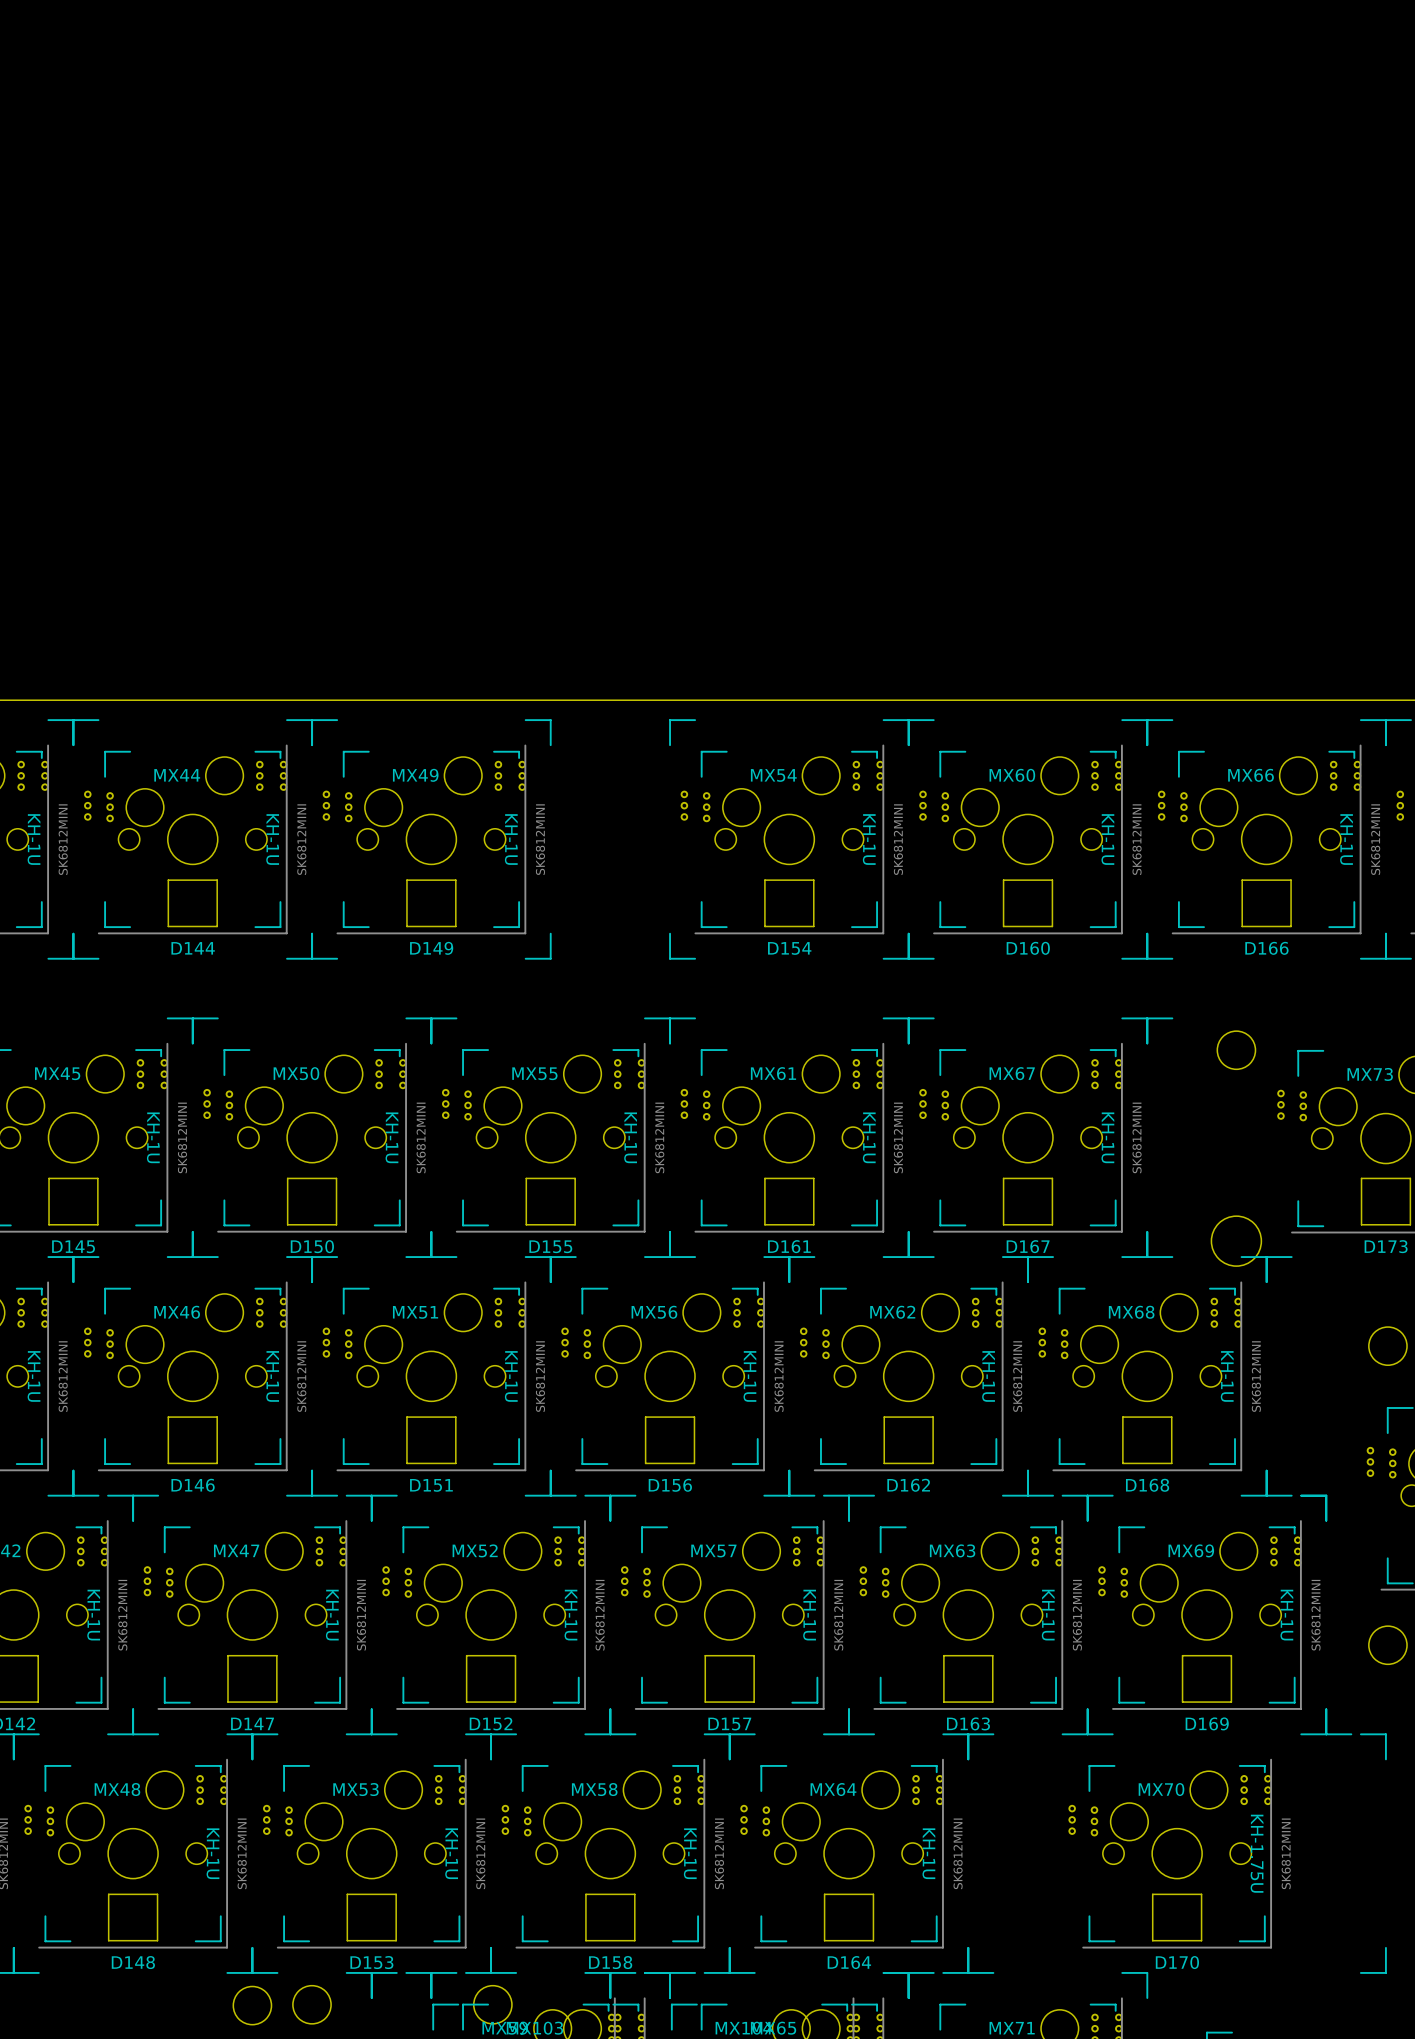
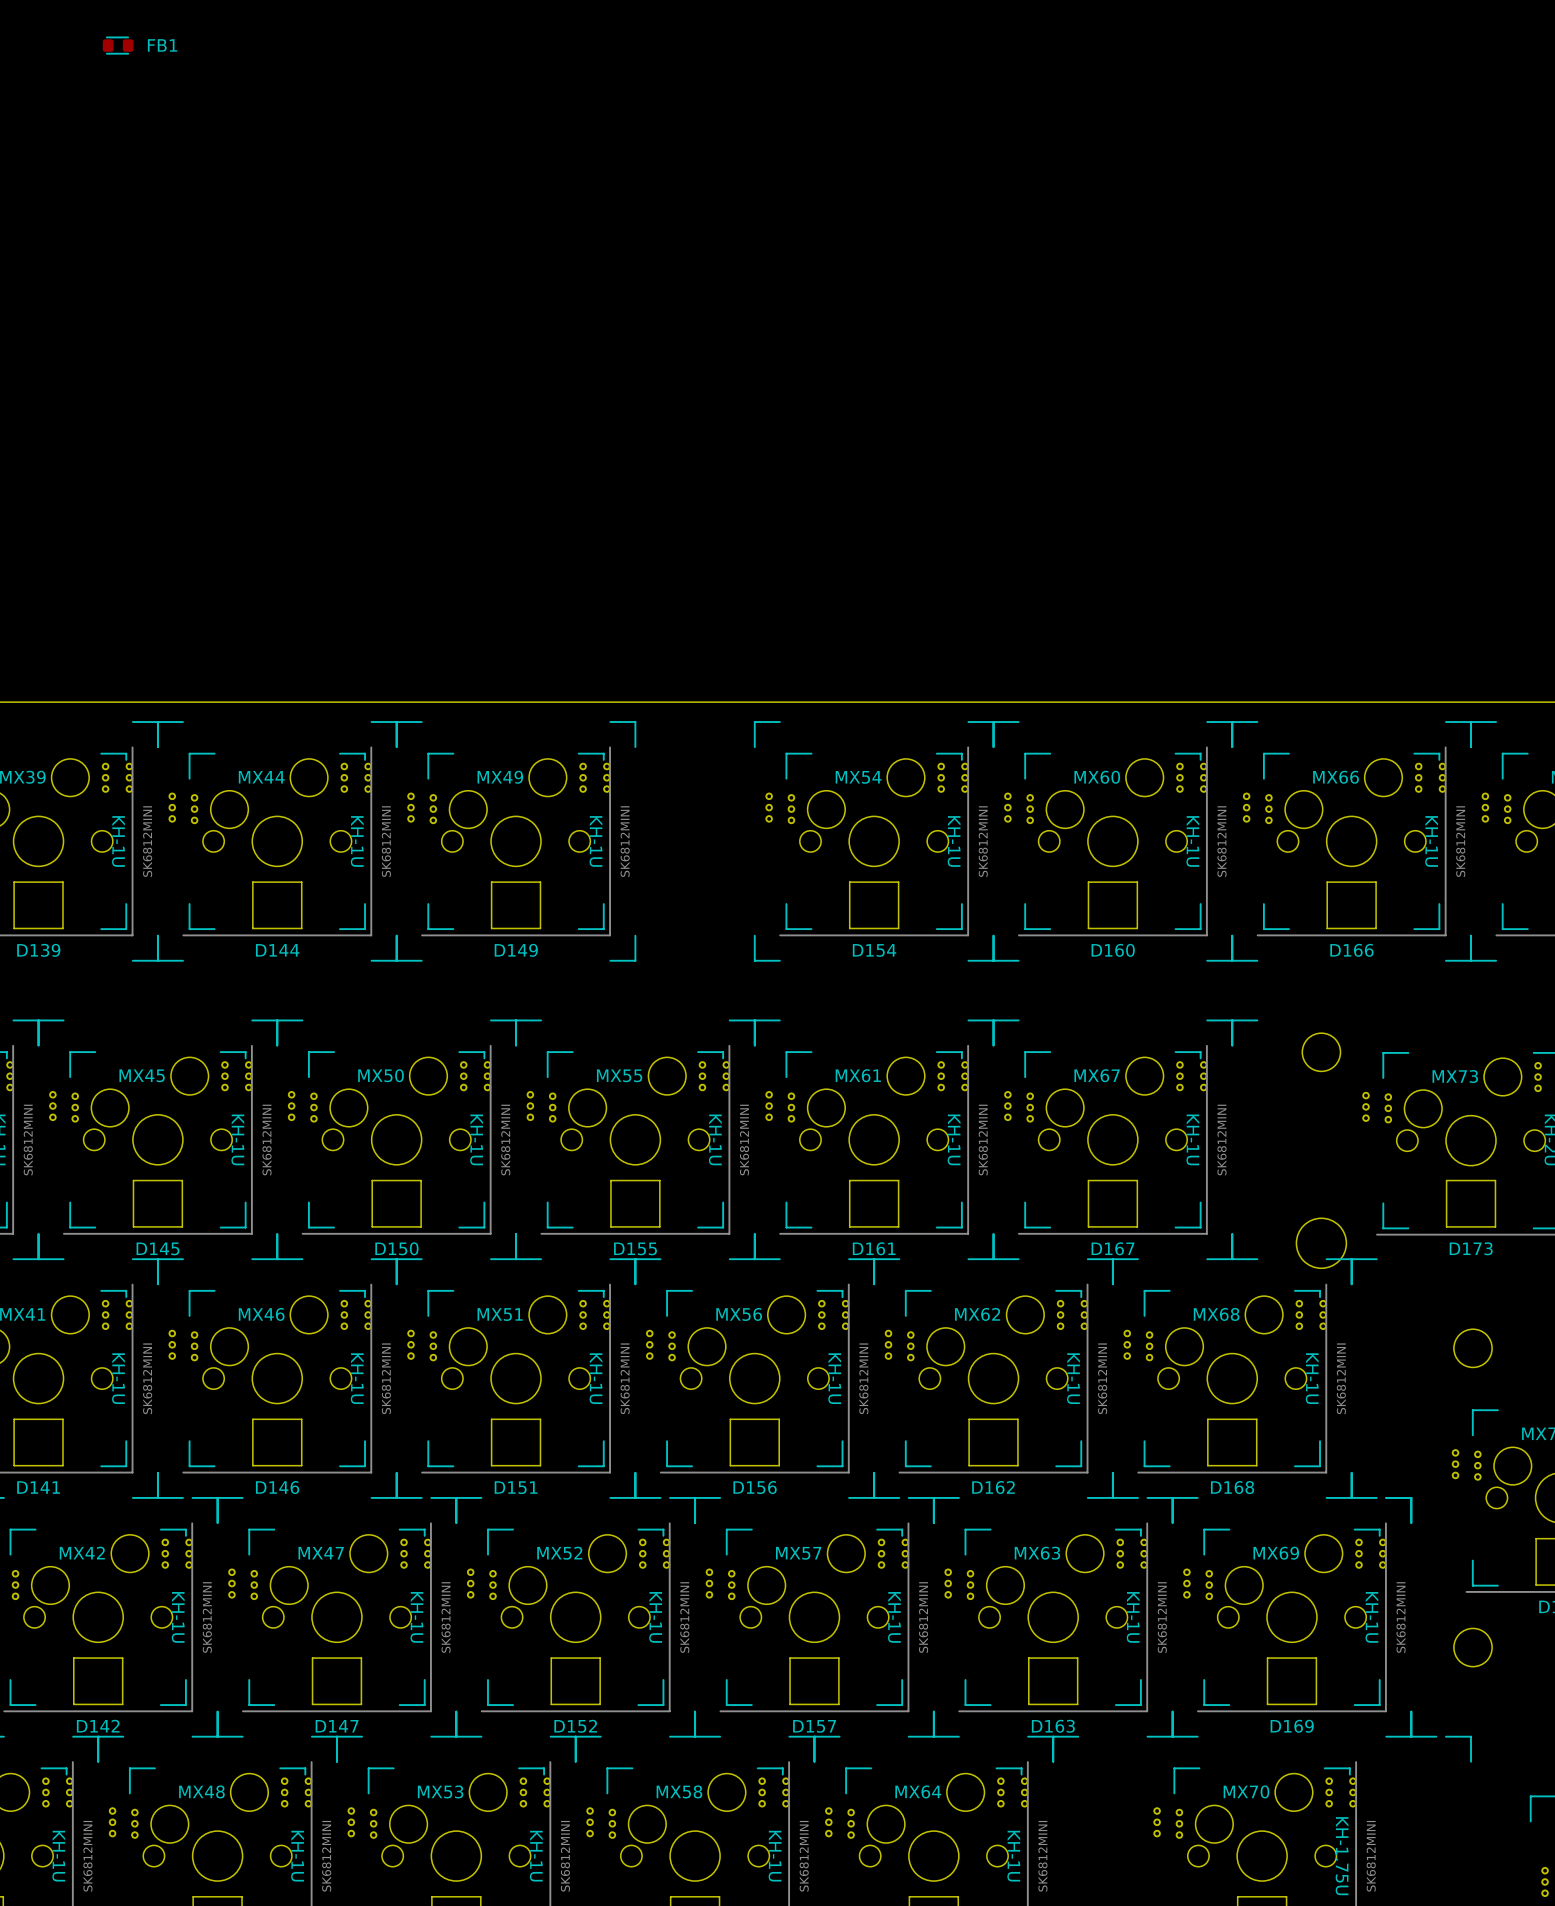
FB1: none -> (118, 45)

